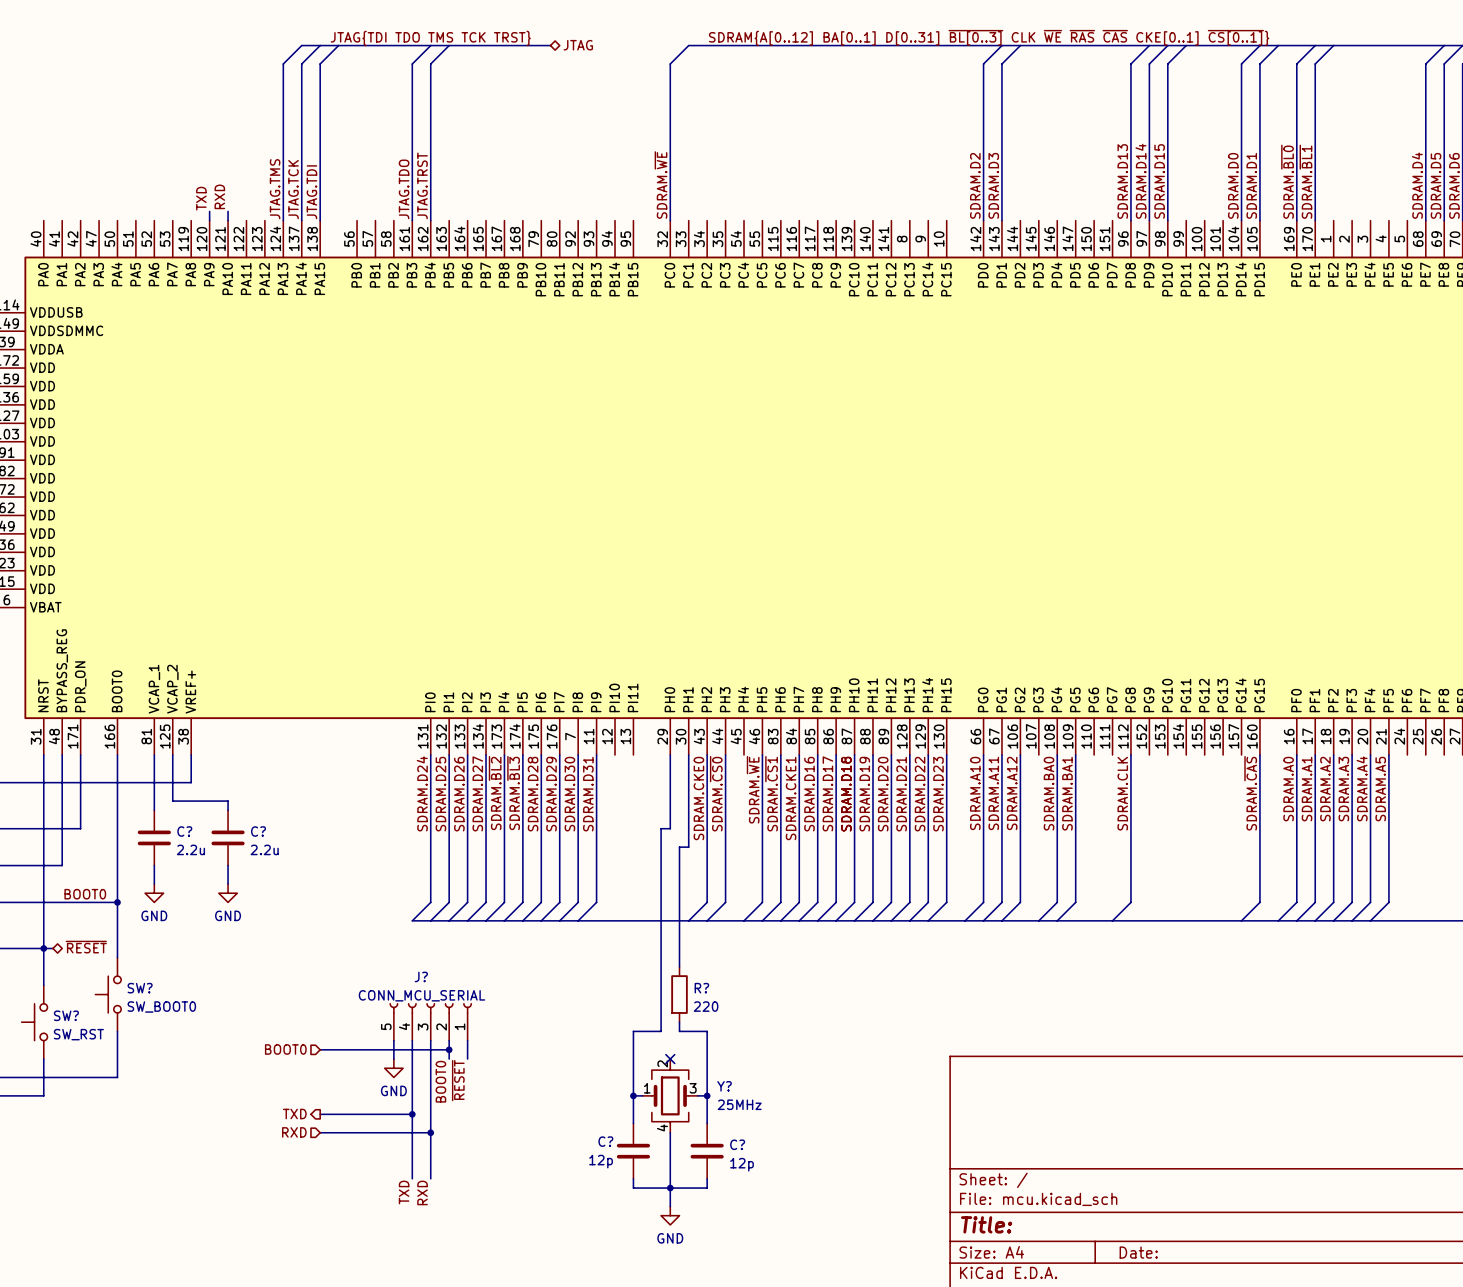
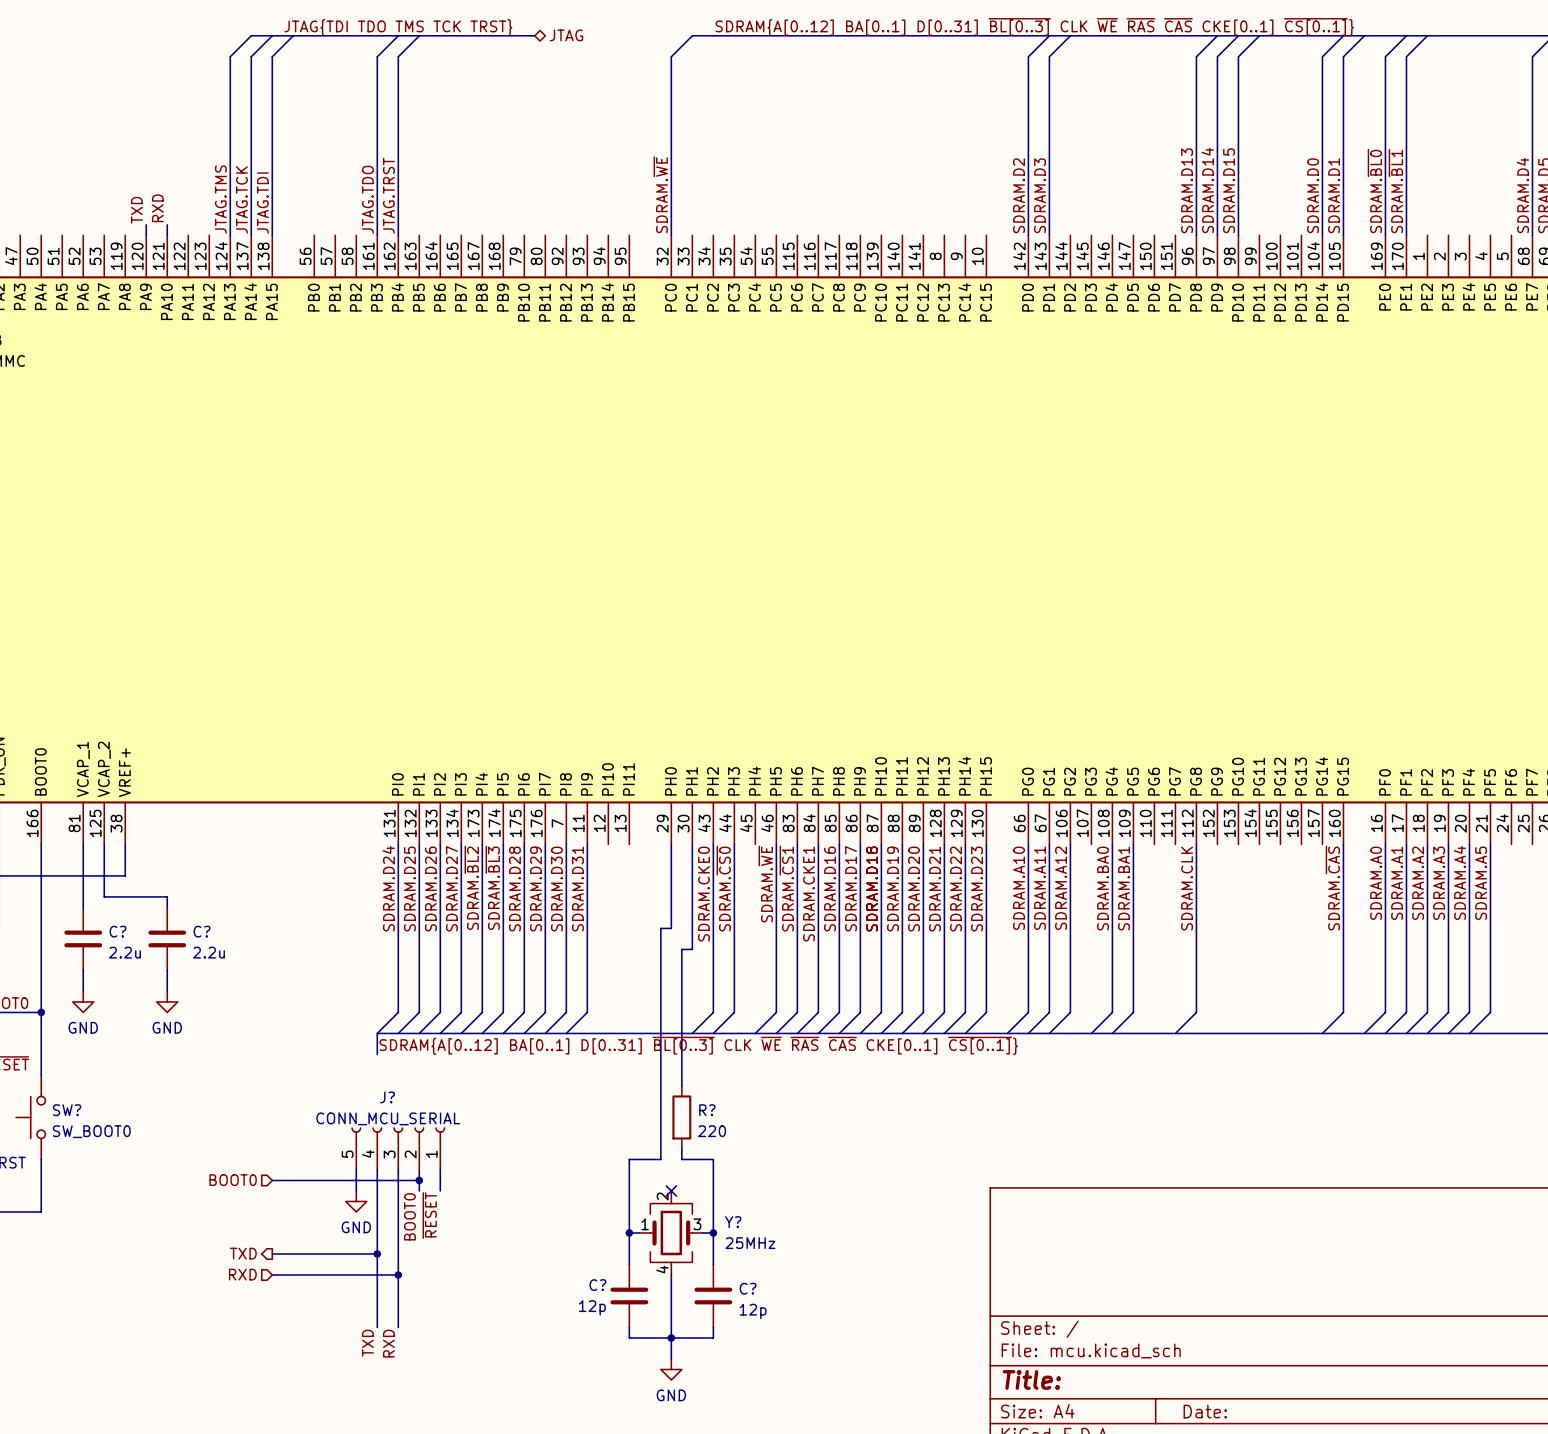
bus: none -> (377, 1033) (377, 1054)
label: none -> SDRAM{A[0..12] BA[0..1] D[0..31] ~{BL[0..3]} CLK ~{WE} ~{RAS} ~{CAS} CKE[0..1] ~{CS[0..1]}} (698, 1045)

